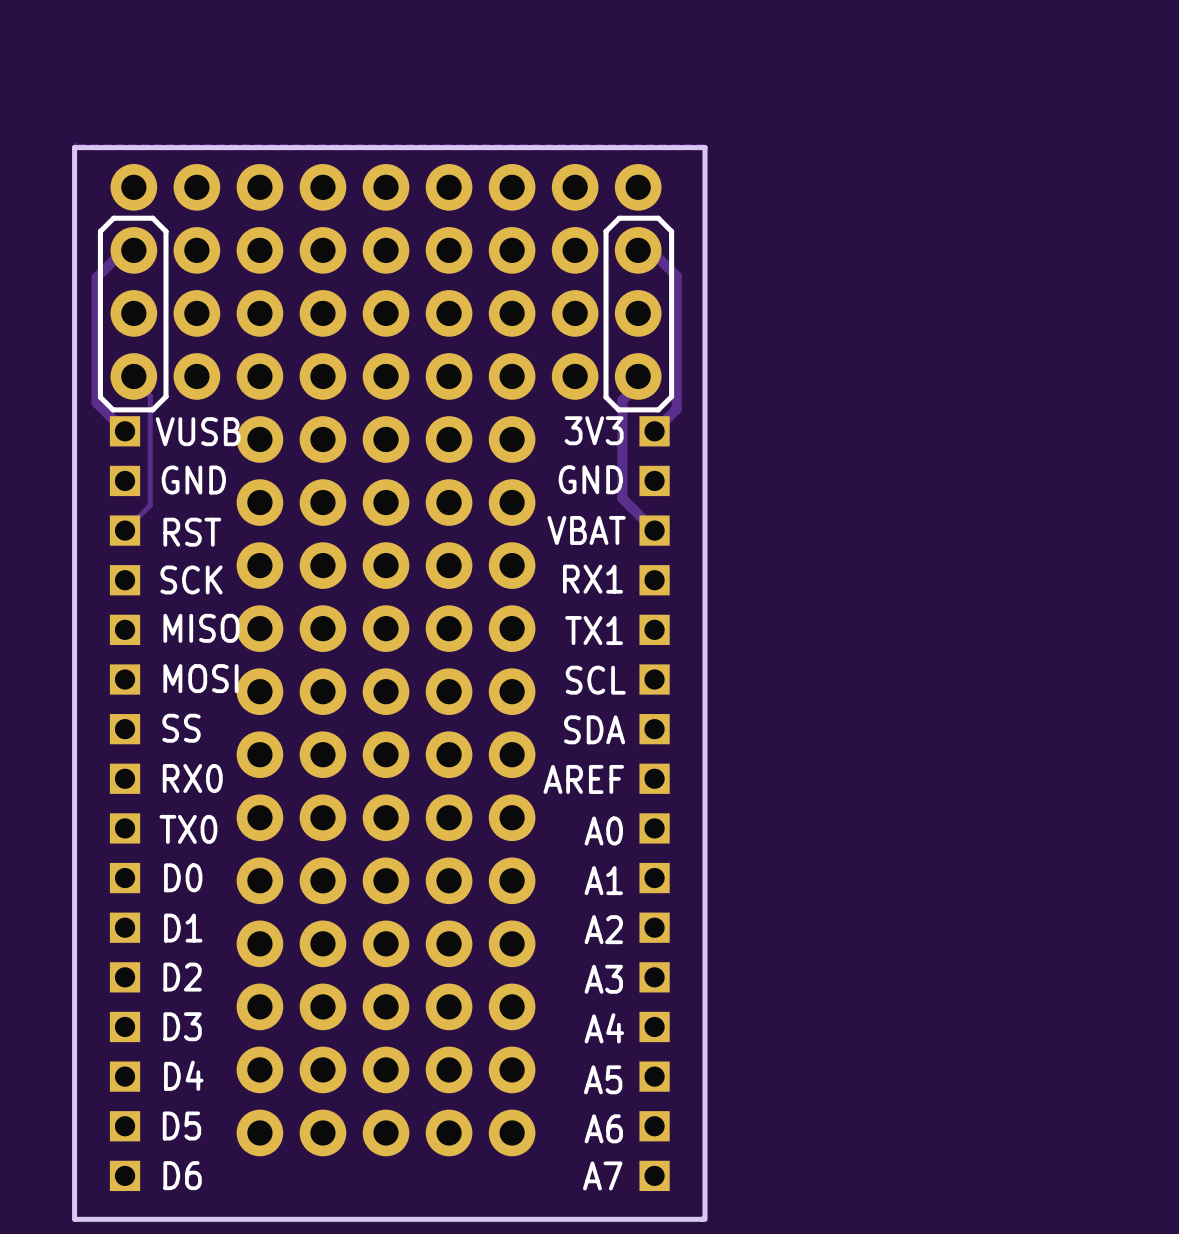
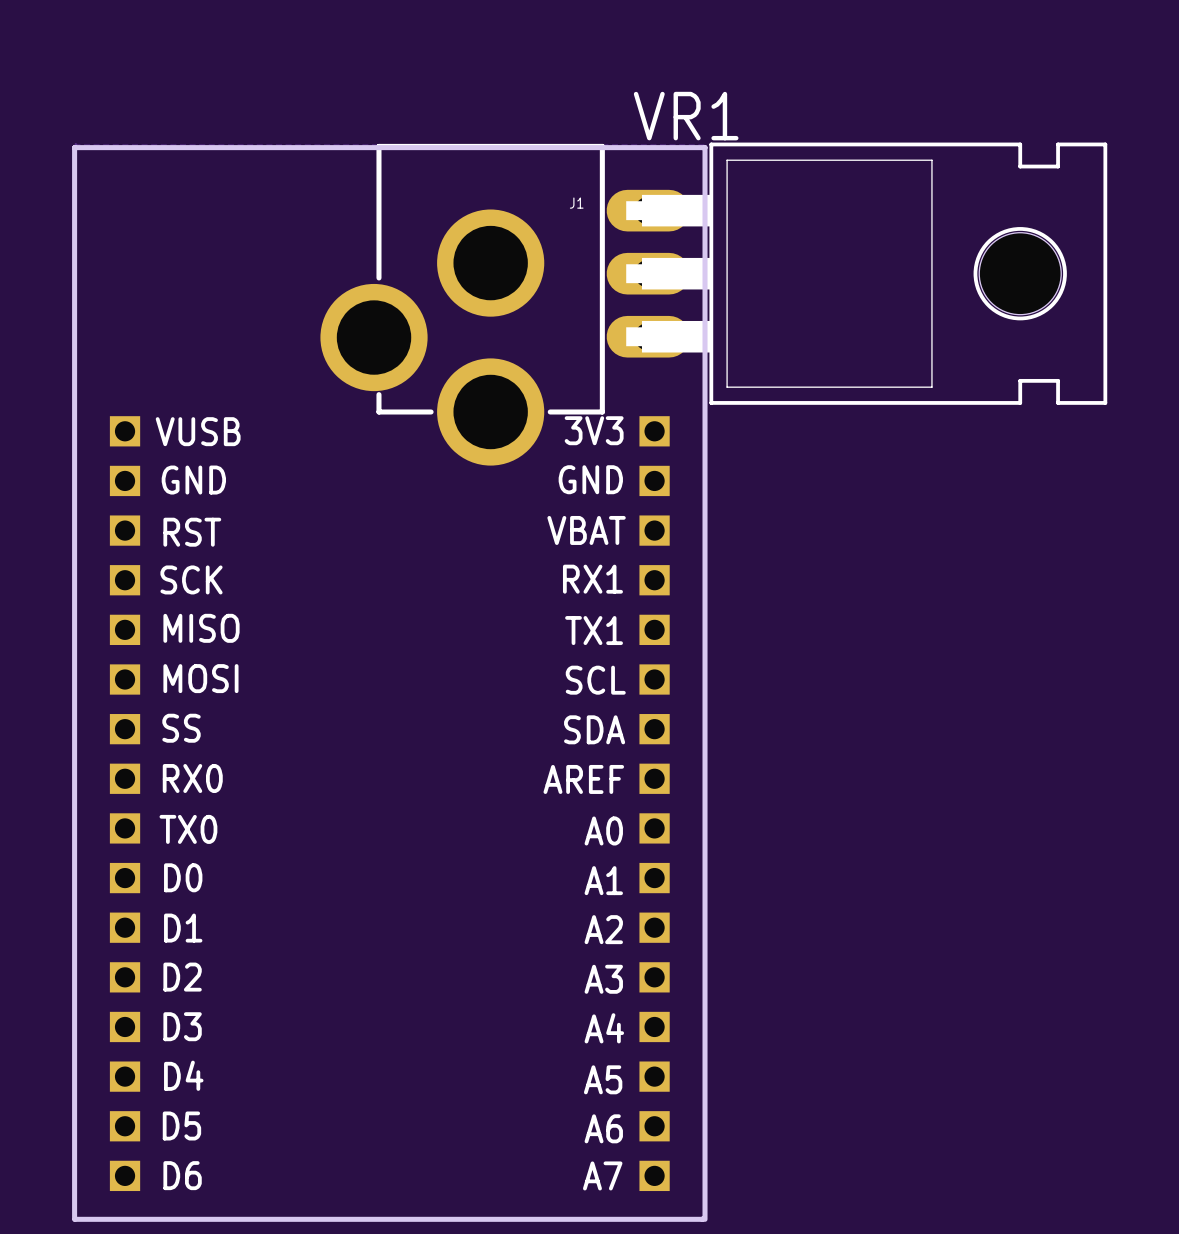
line: (113, 218) (152, 218) (166, 231) (166, 396) (152, 409) (113, 409) (100, 397) (100, 231) (113, 218) -> none
line: (619, 218) (658, 218) (671, 231) (671, 396) (658, 409) (618, 409) (606, 397) (606, 231) (619, 218) -> none
track: (133, 250) (123, 250) (96, 277) (96, 402) (125, 431) -> none
track: (638, 250) (650, 250) (676, 276) (676, 409) (654, 431) -> none
VR1: none -> (856, 273)
J1: none -> (462, 304)
track: (133, 376) (133, 379) (150, 396) (150, 505) (125, 530) -> none
track: (638, 376) (638, 384) (622, 400) (622, 498) (654, 530) -> none
part: (386, 660) -> none

